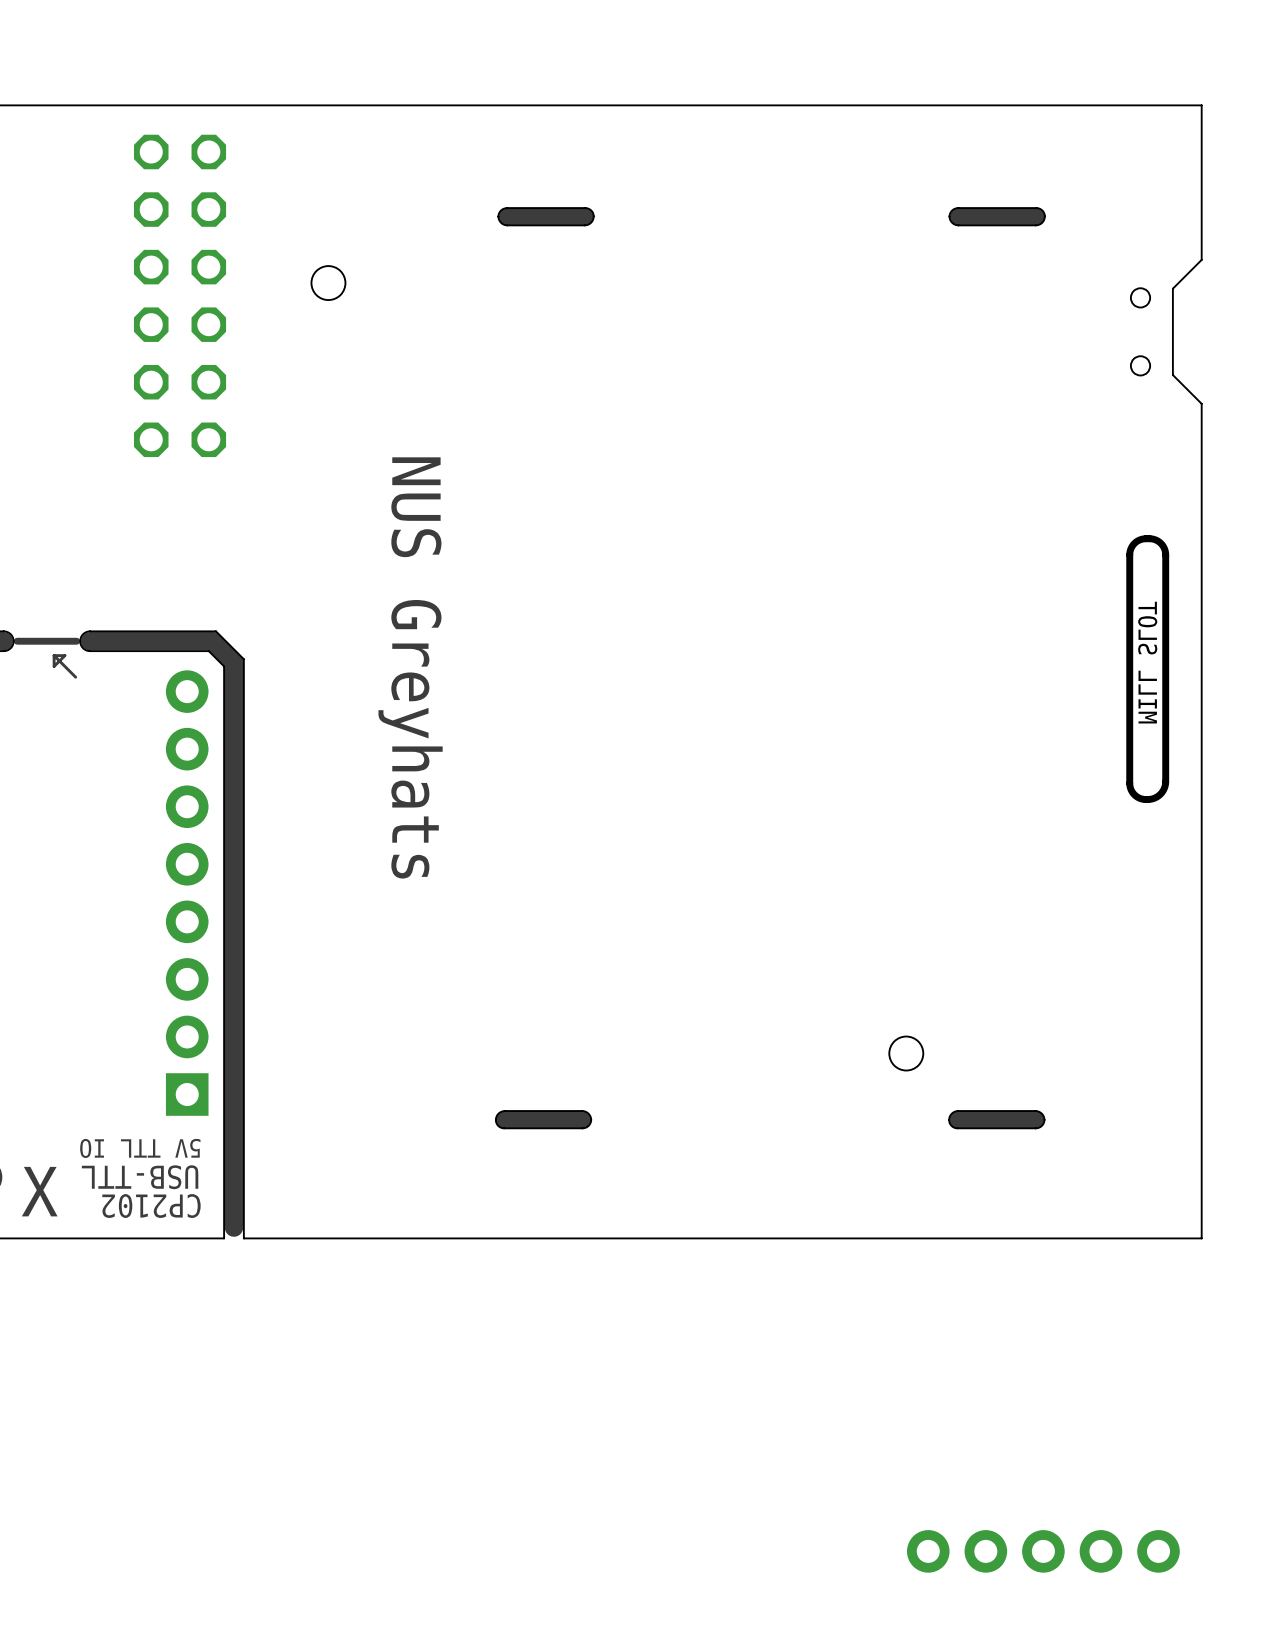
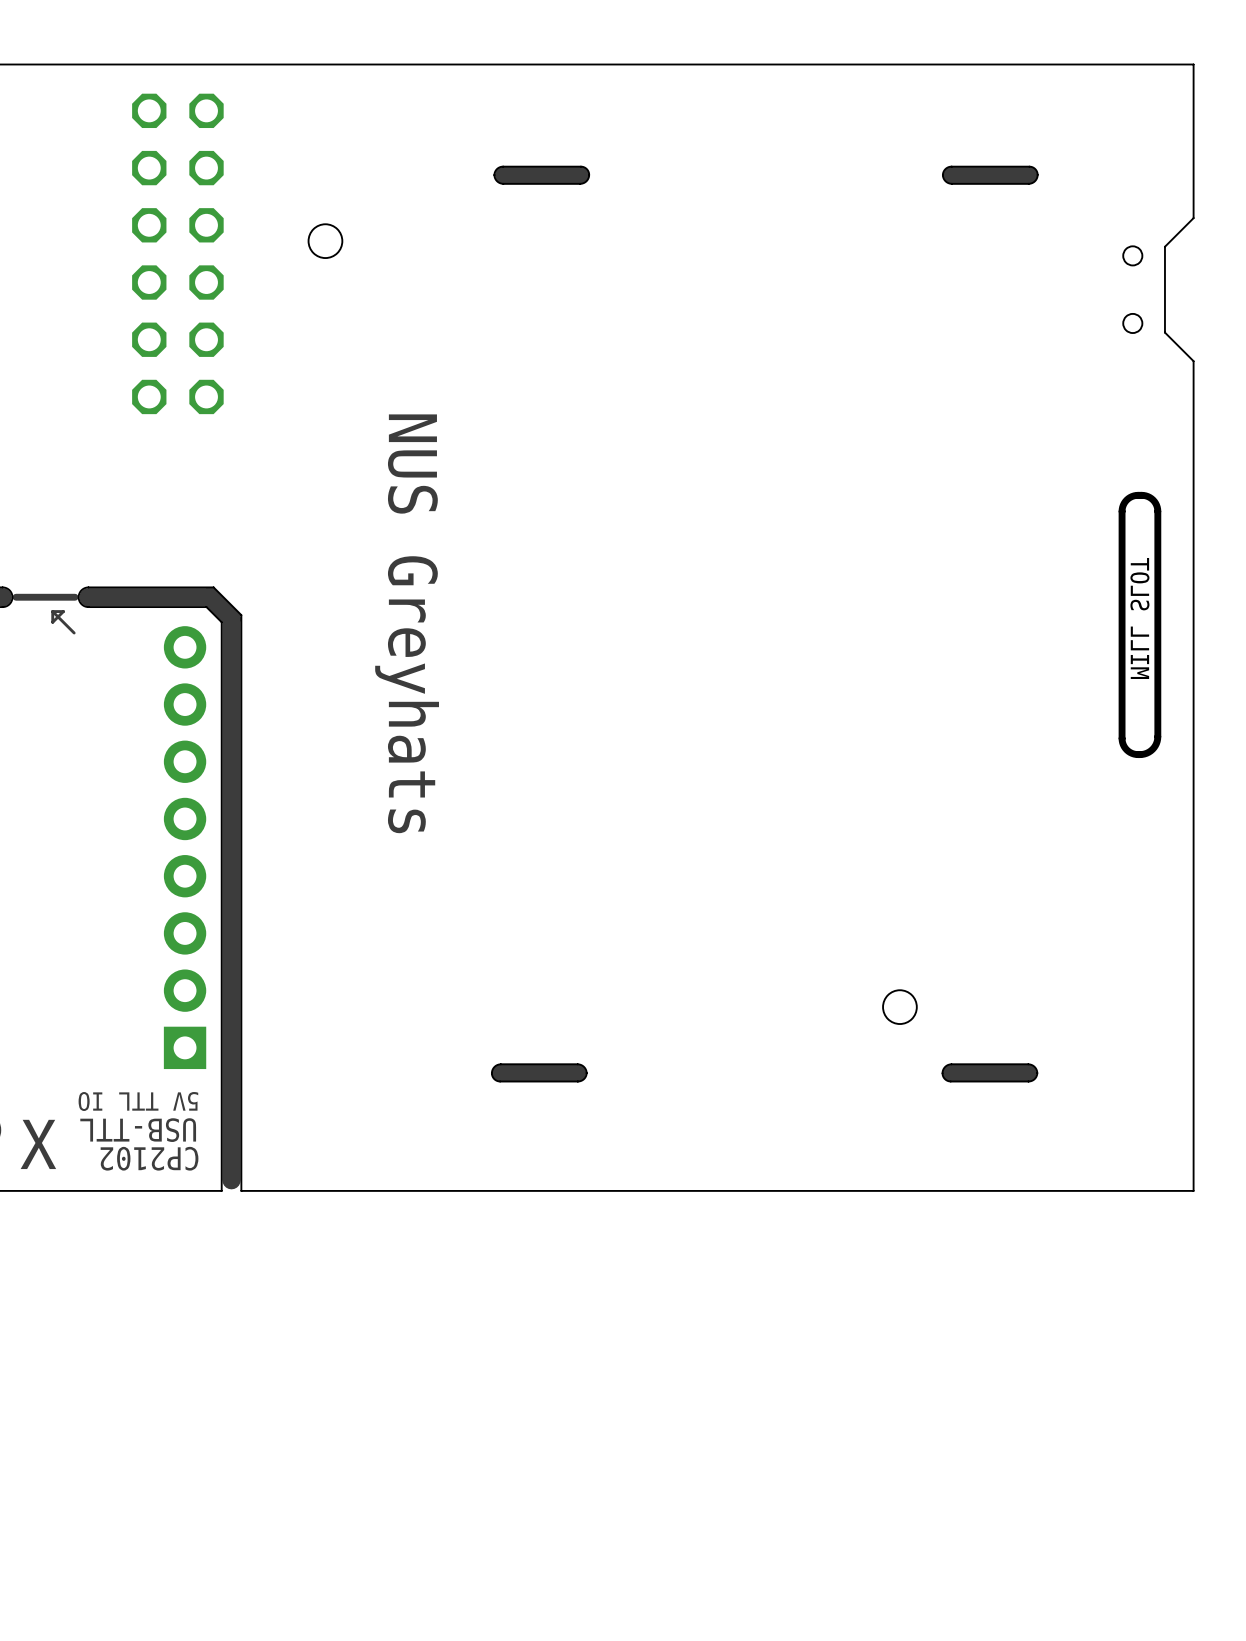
part: (1043, 1551) -> none

